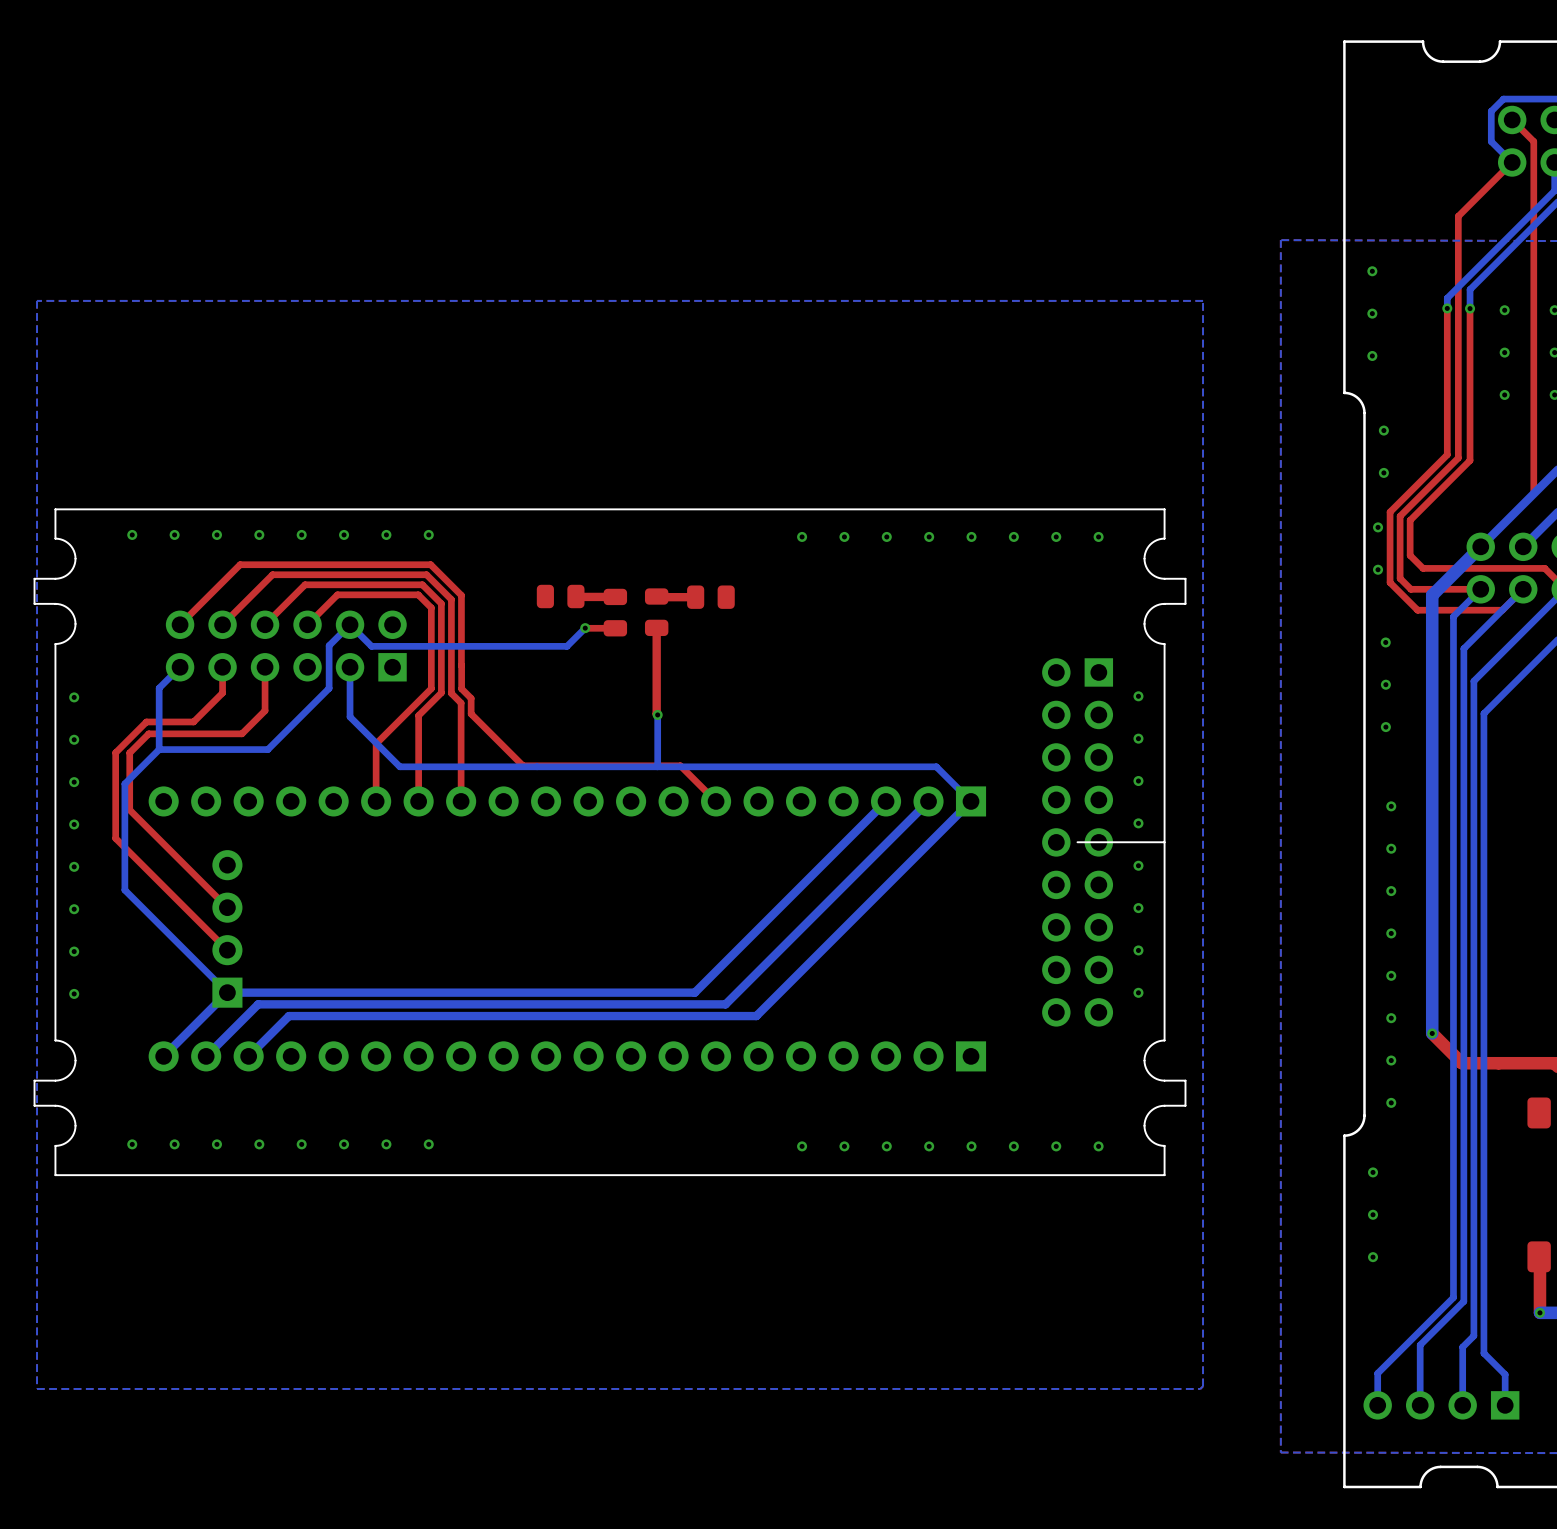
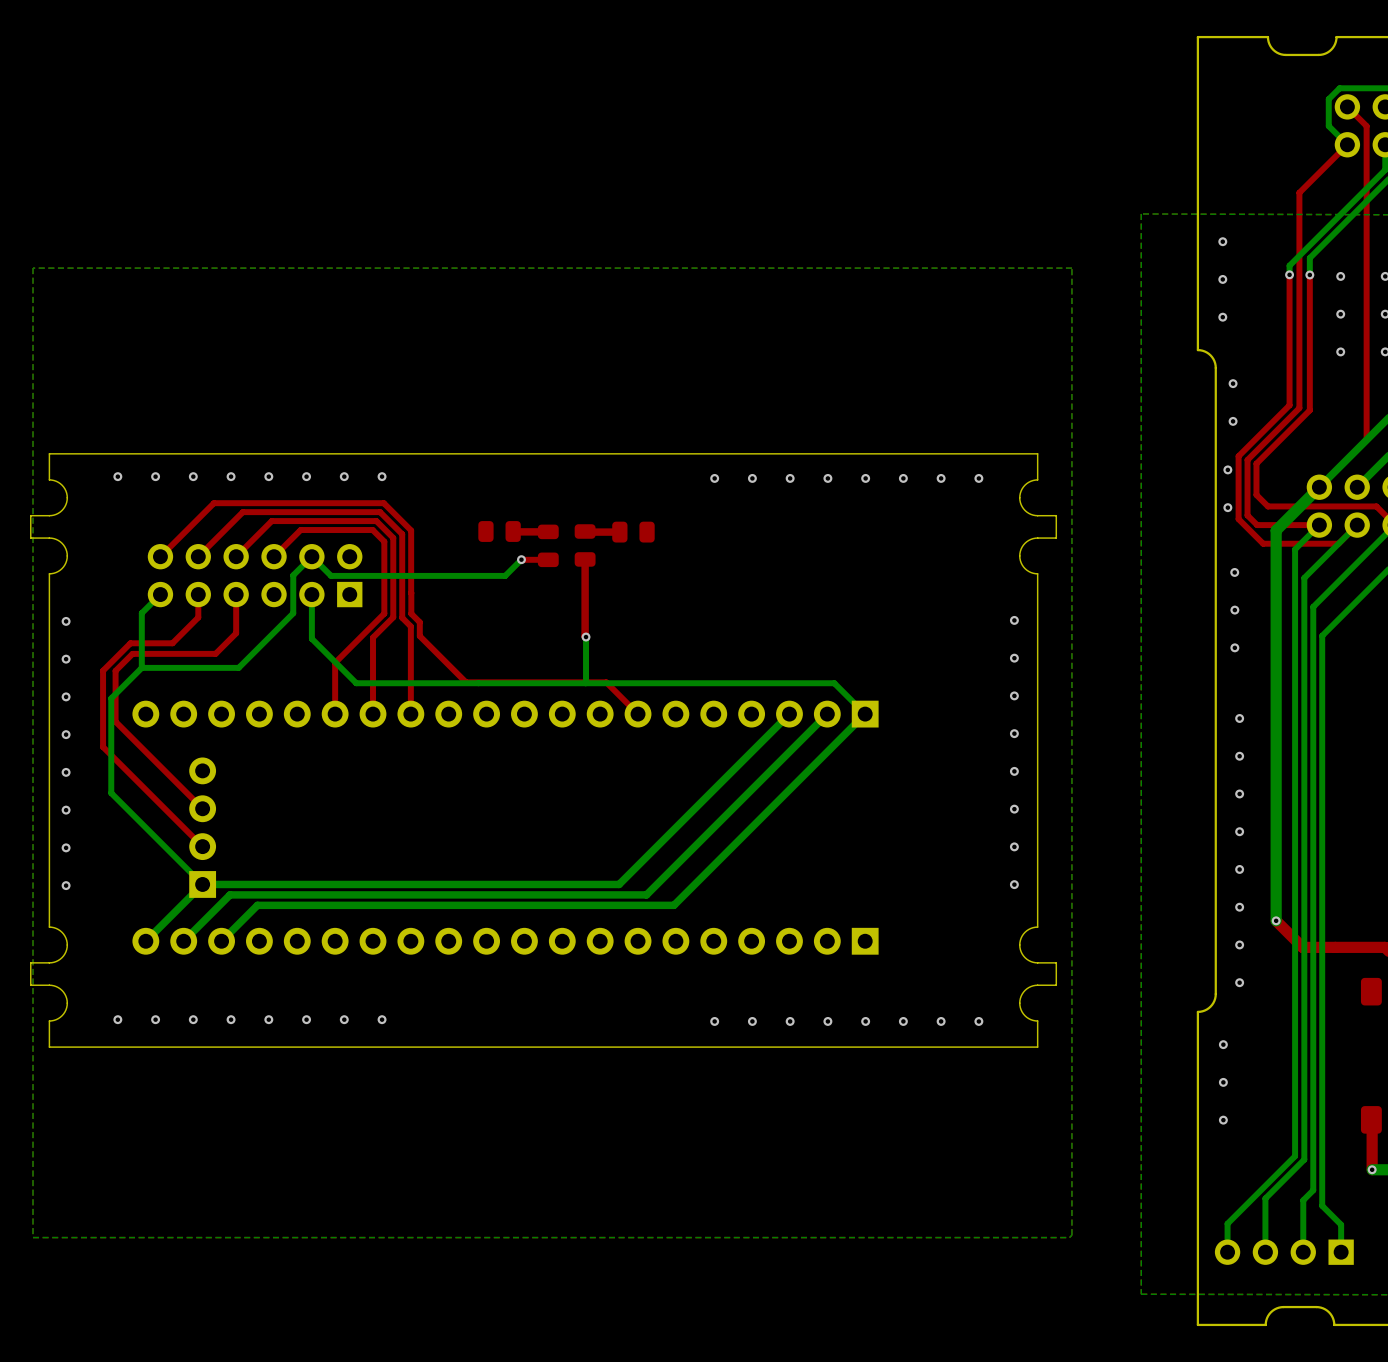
part: (1077, 842) -> none
board edge: (1164, 842) (1077, 842) -> none

